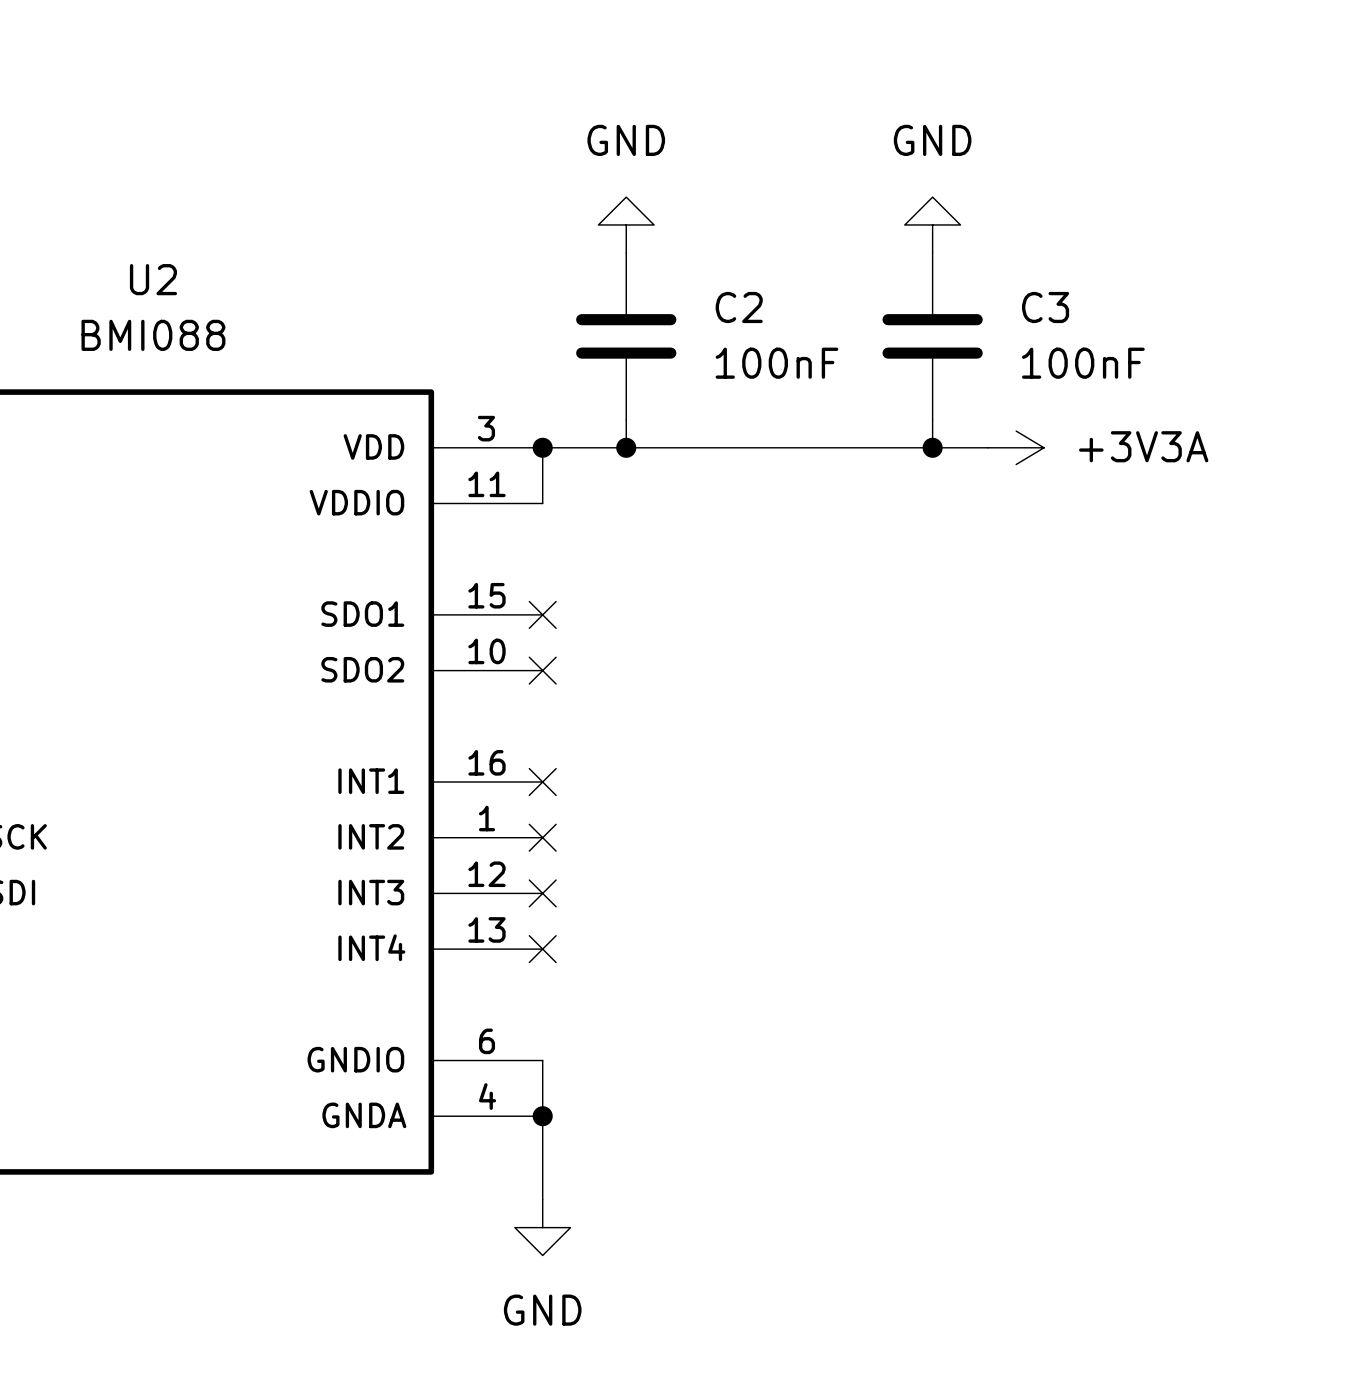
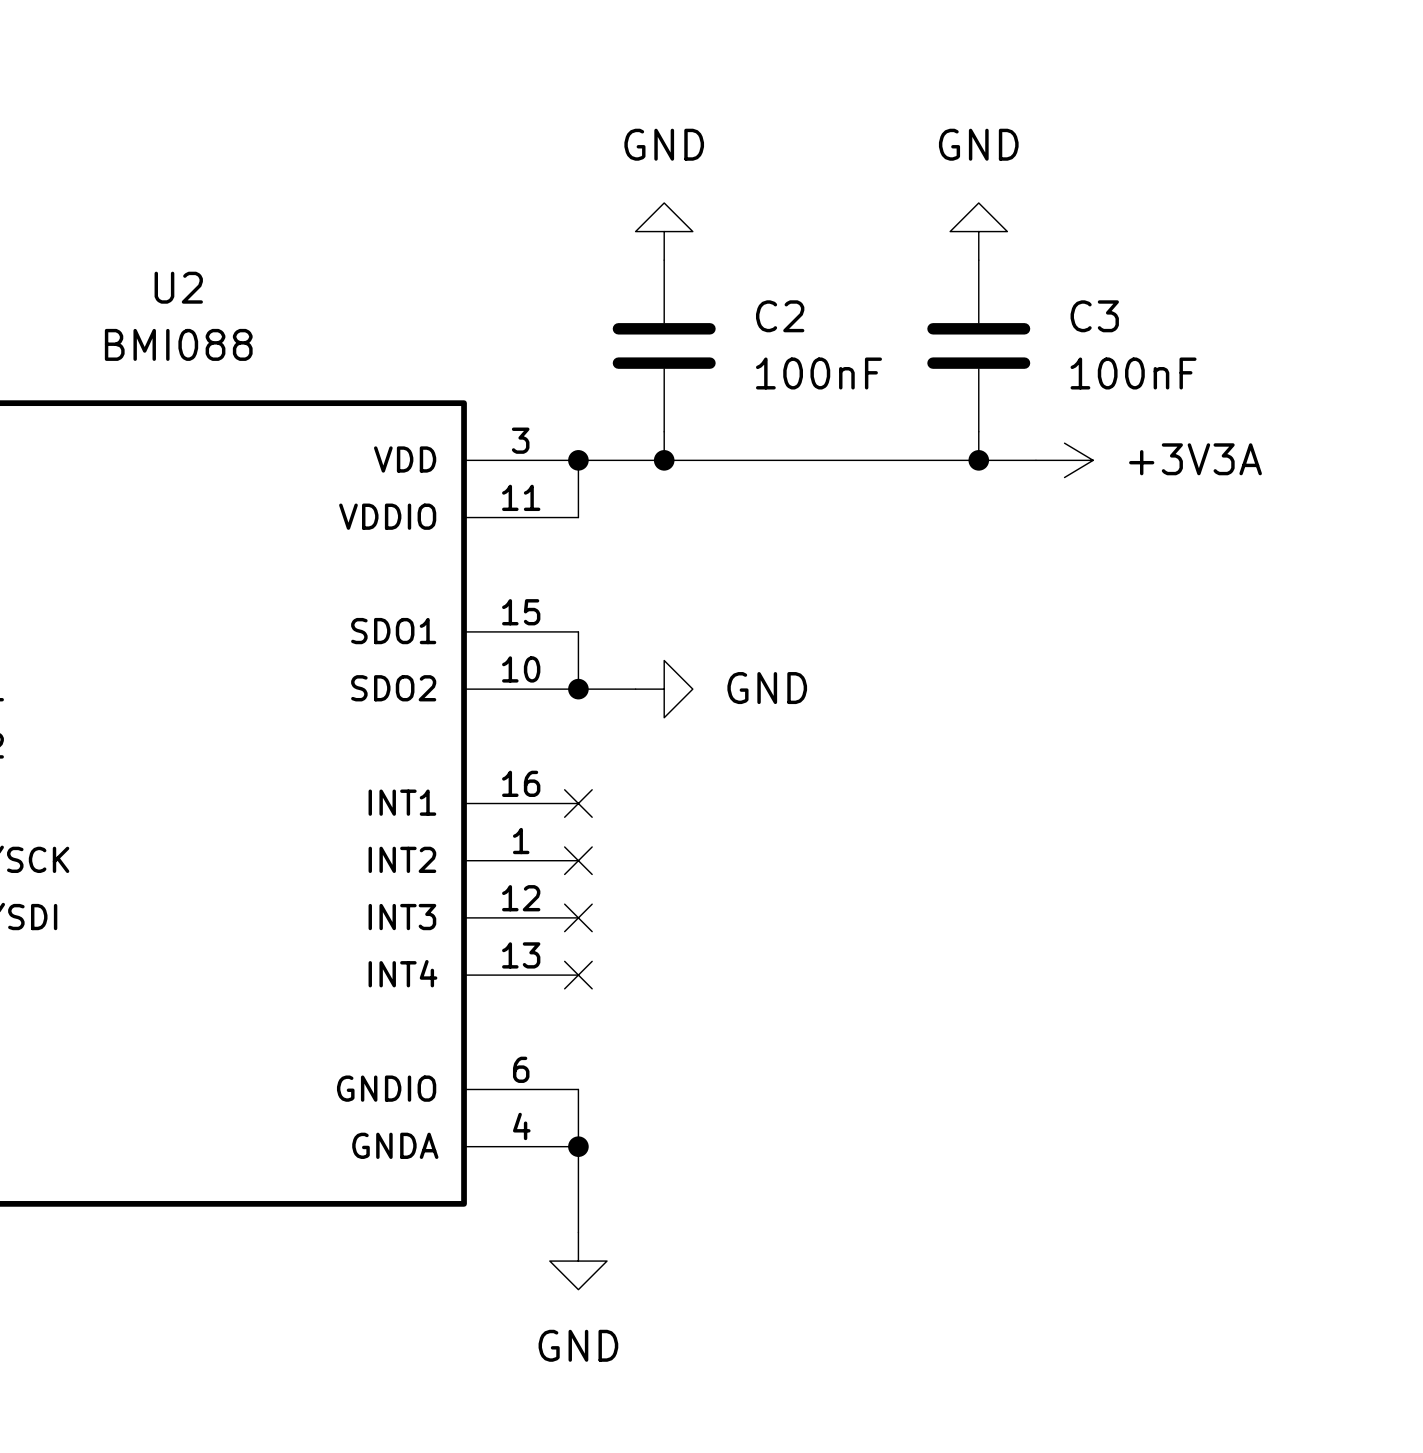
wire: none -> (578, 631) (578, 689) (635, 689)
no-connect mark: (542, 614) -> none
no-connect mark: (542, 670) -> none
junction: none -> (578, 689)
power symbol: none -> GND (664, 689)

